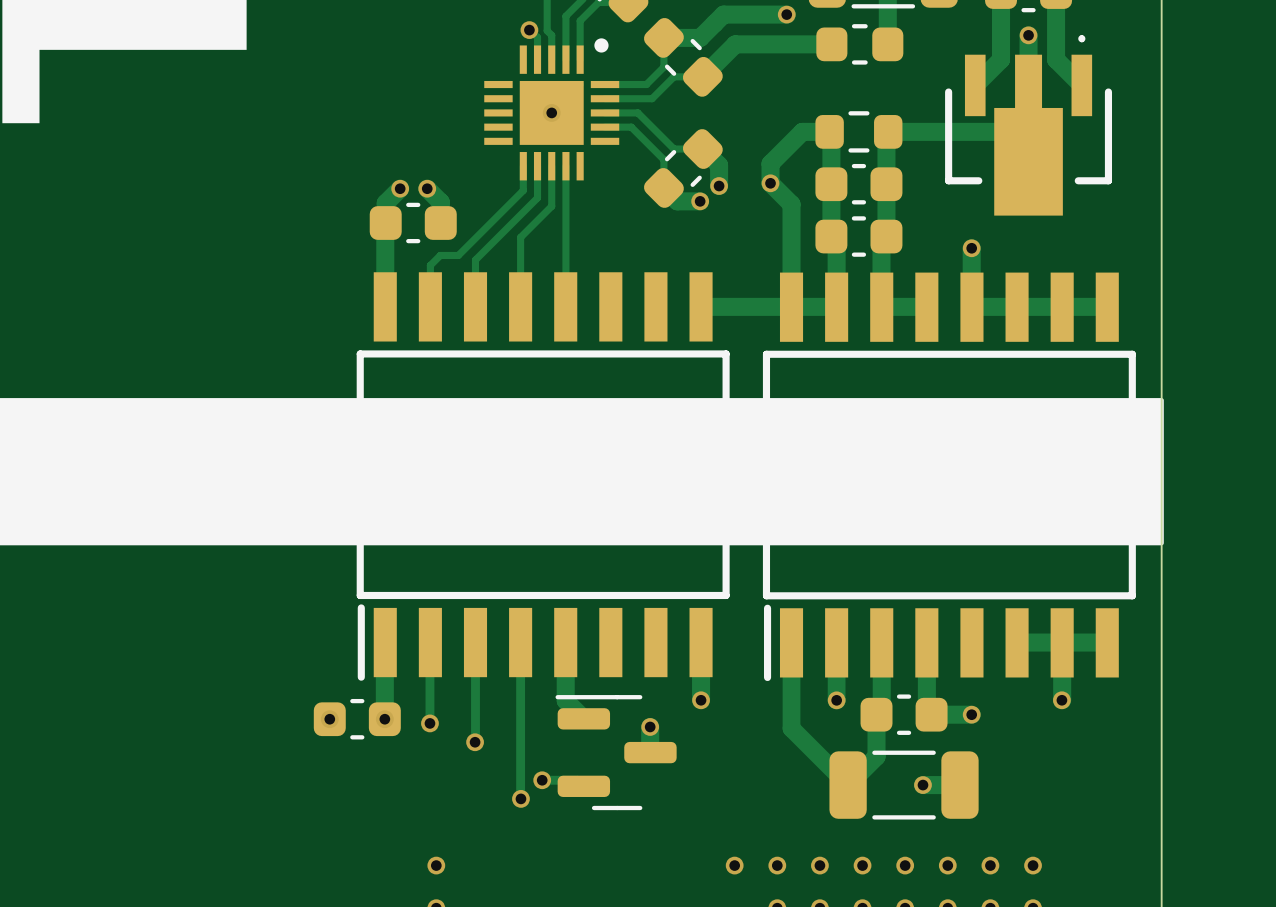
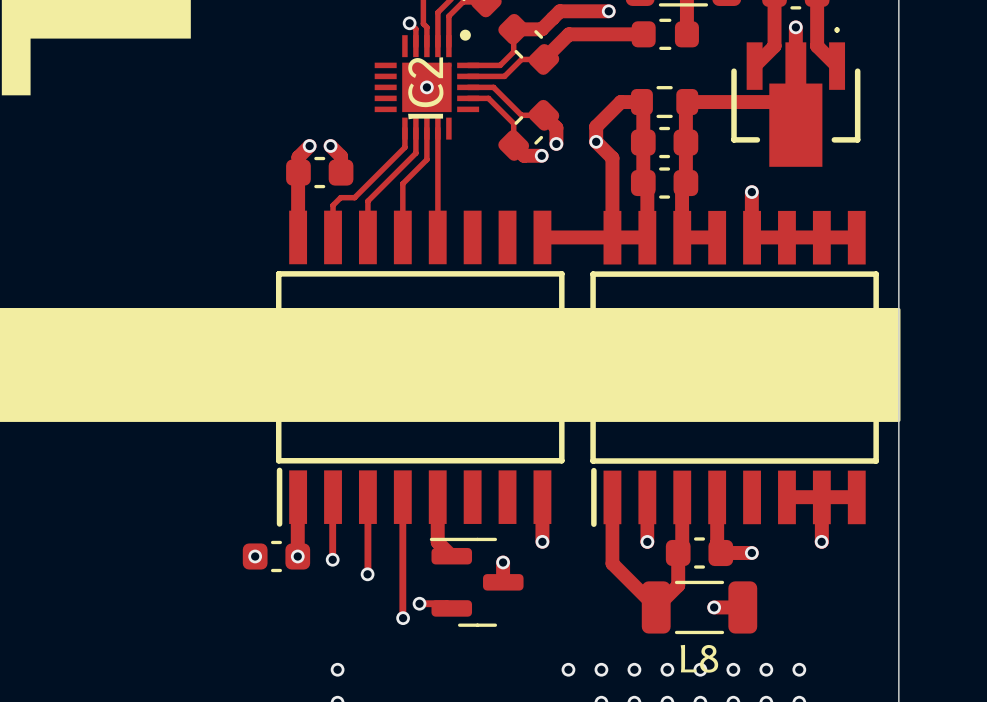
IC2 name: none -> IC2 (425, 88)
L8 name: none -> L8 (699, 658)

